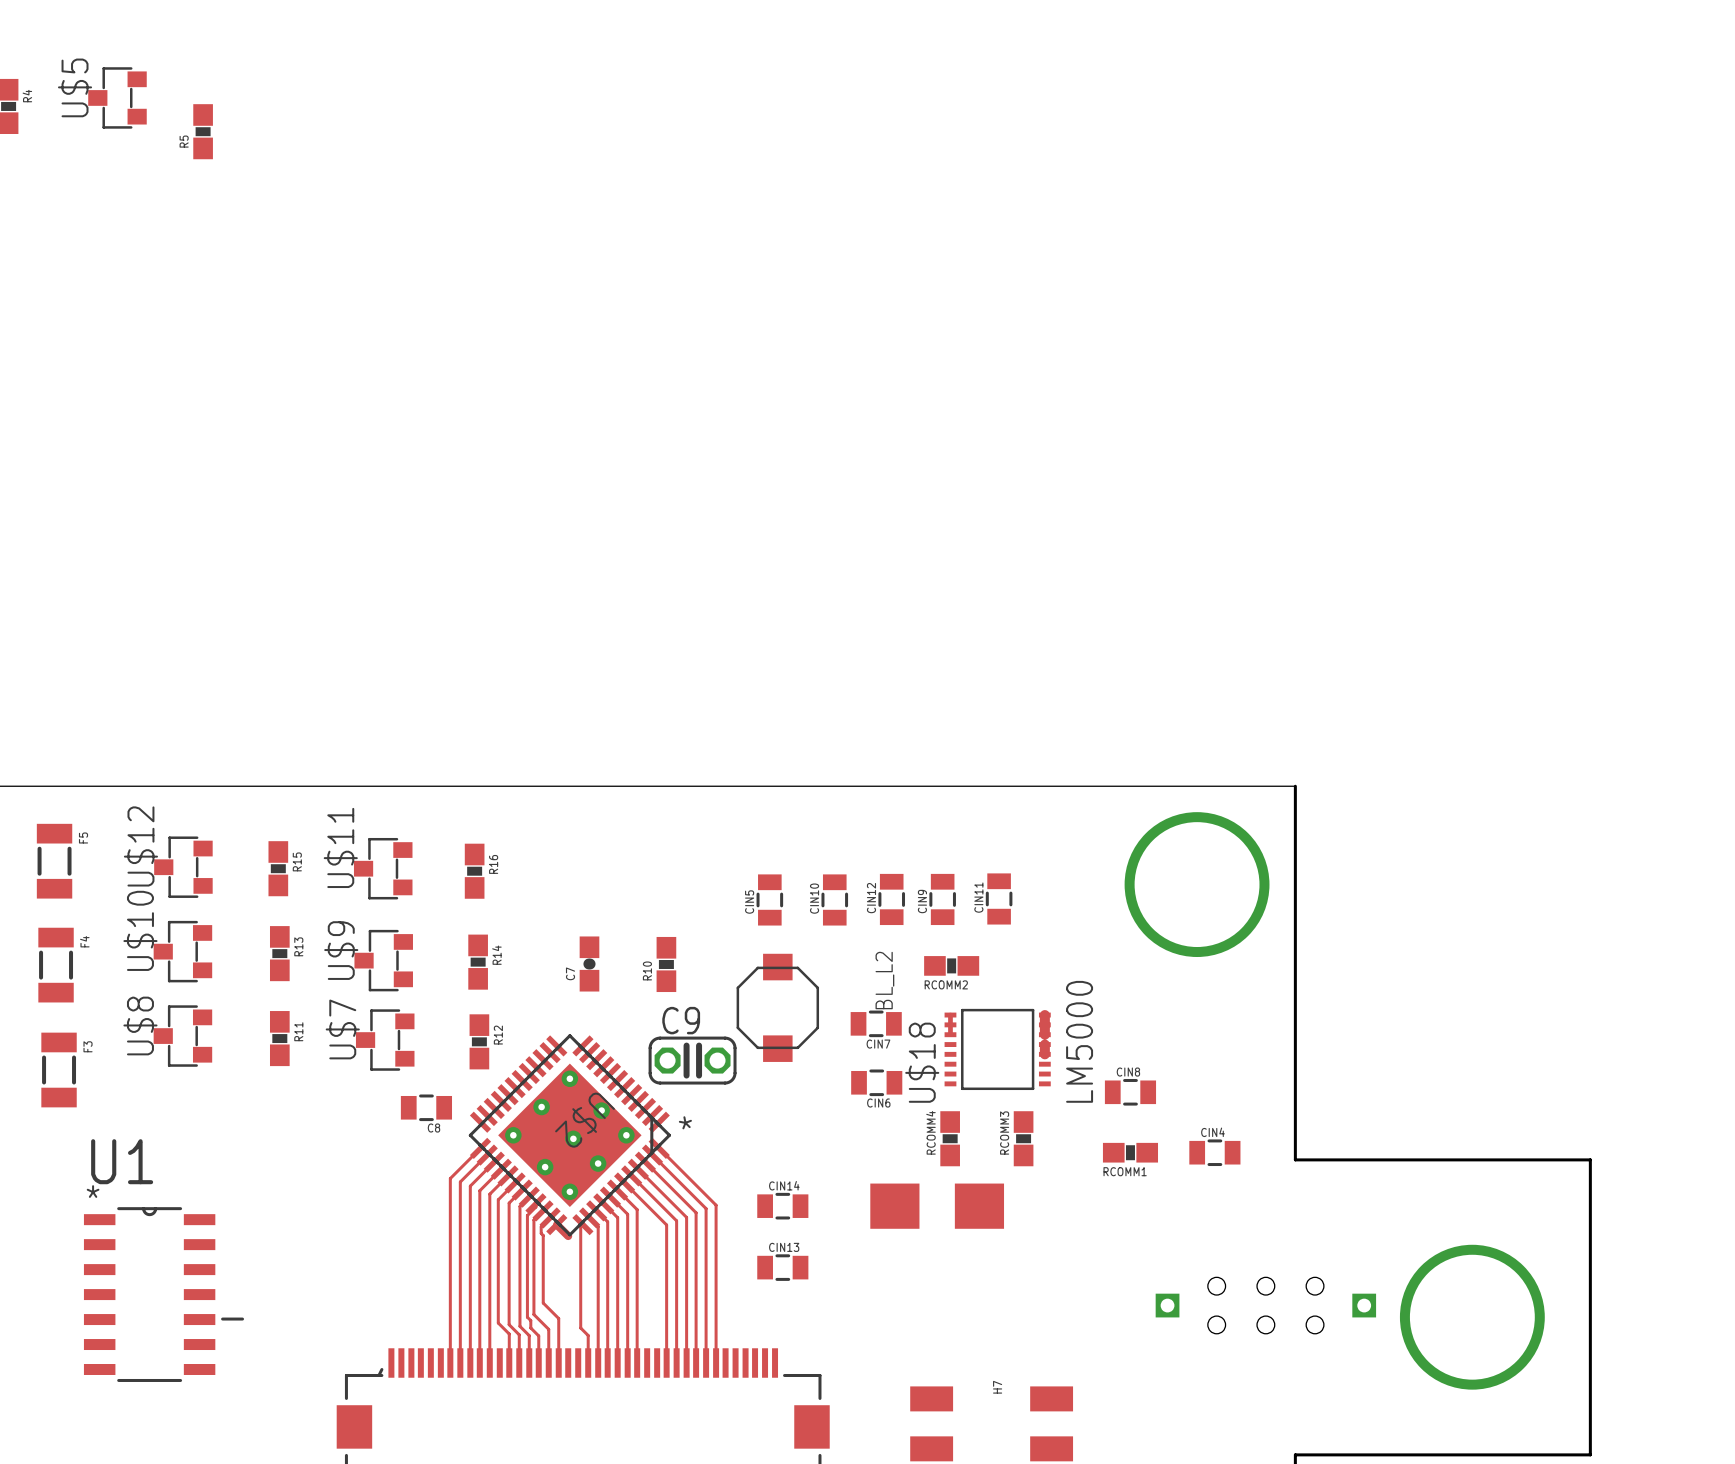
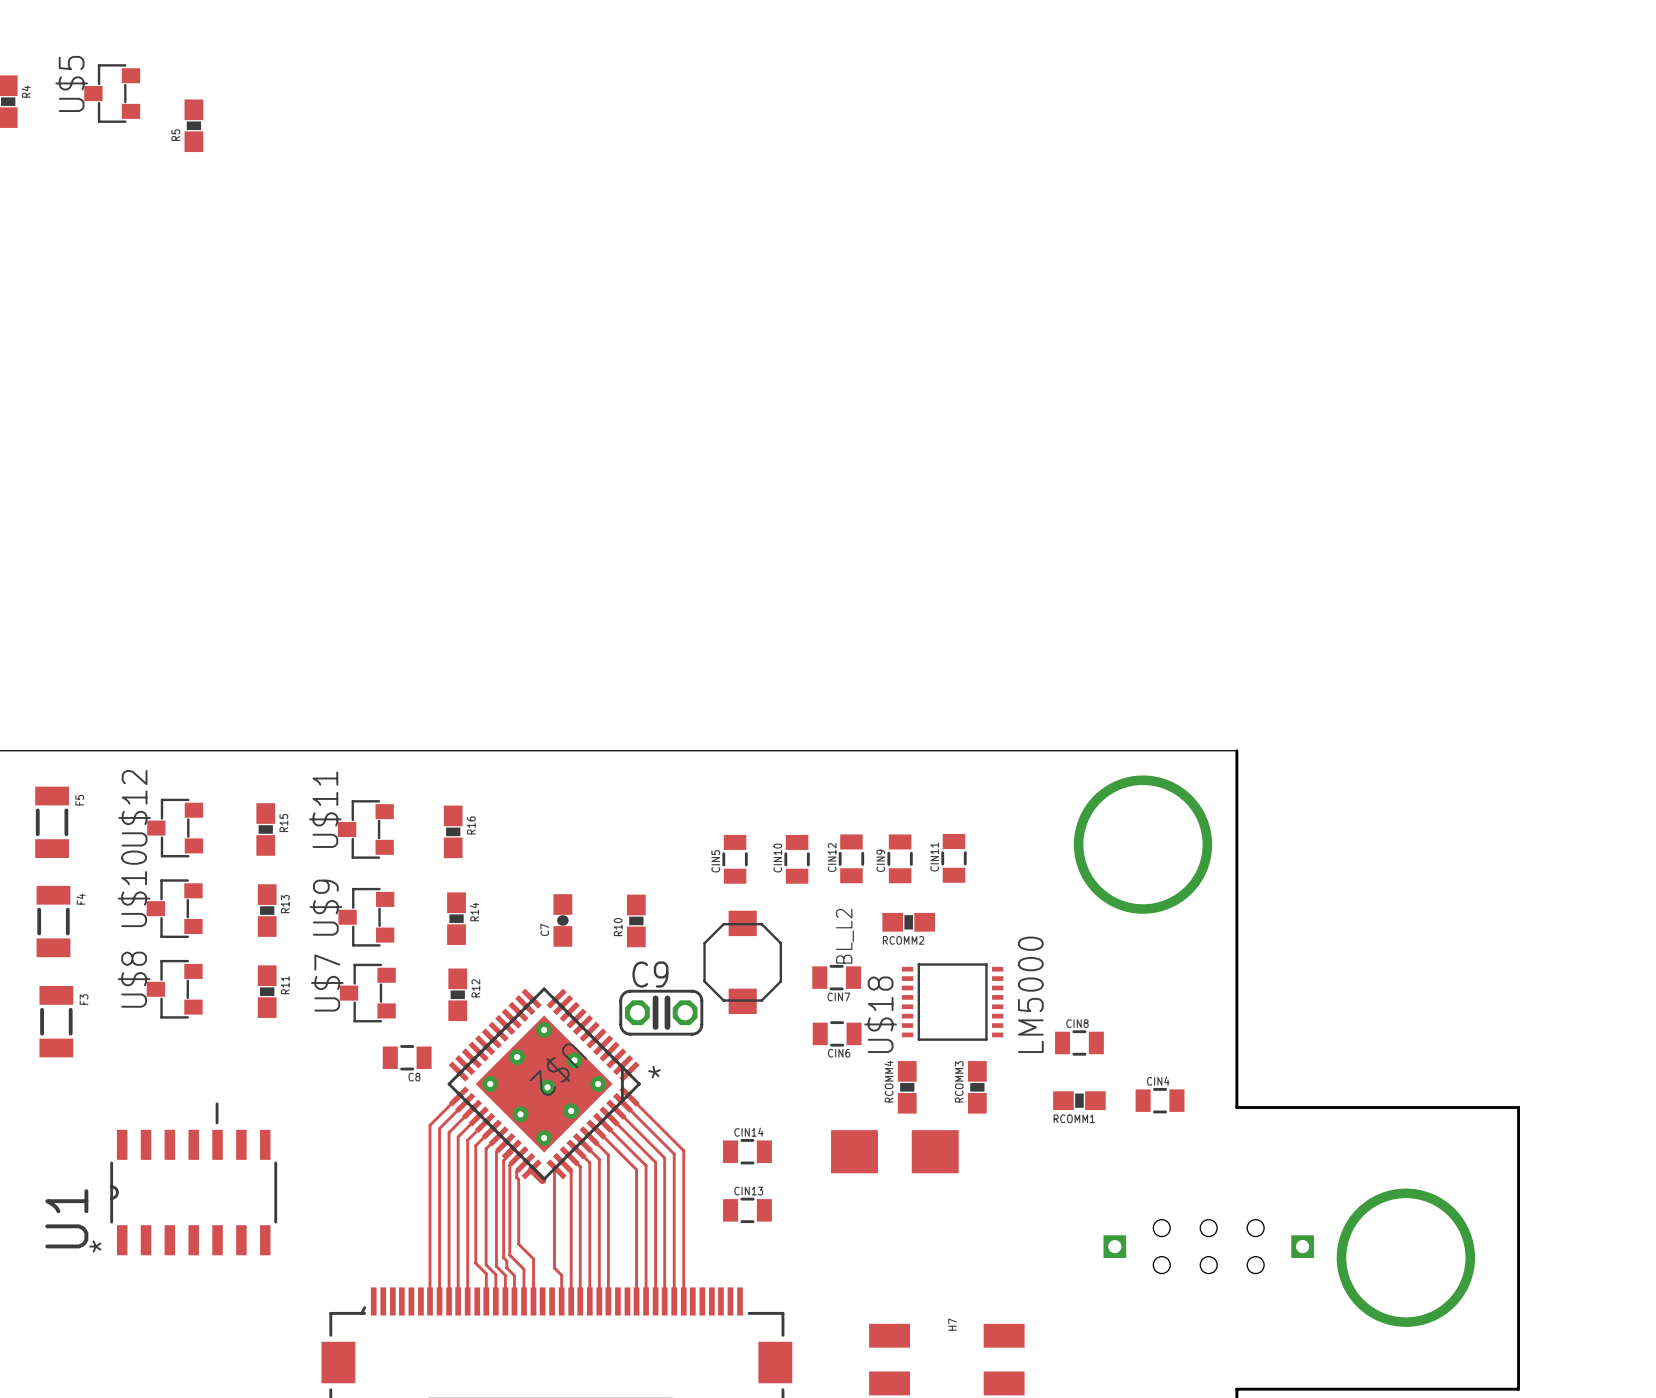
top track: (950, 1015) (950, 1034) -> none
top track: (1044, 1015) (1044, 1034) -> none
top track: (1044, 1044) (1044, 1054) -> none
U1 rotation: 0° (163, 1294) -> 90° counterclockwise (193, 1178)

